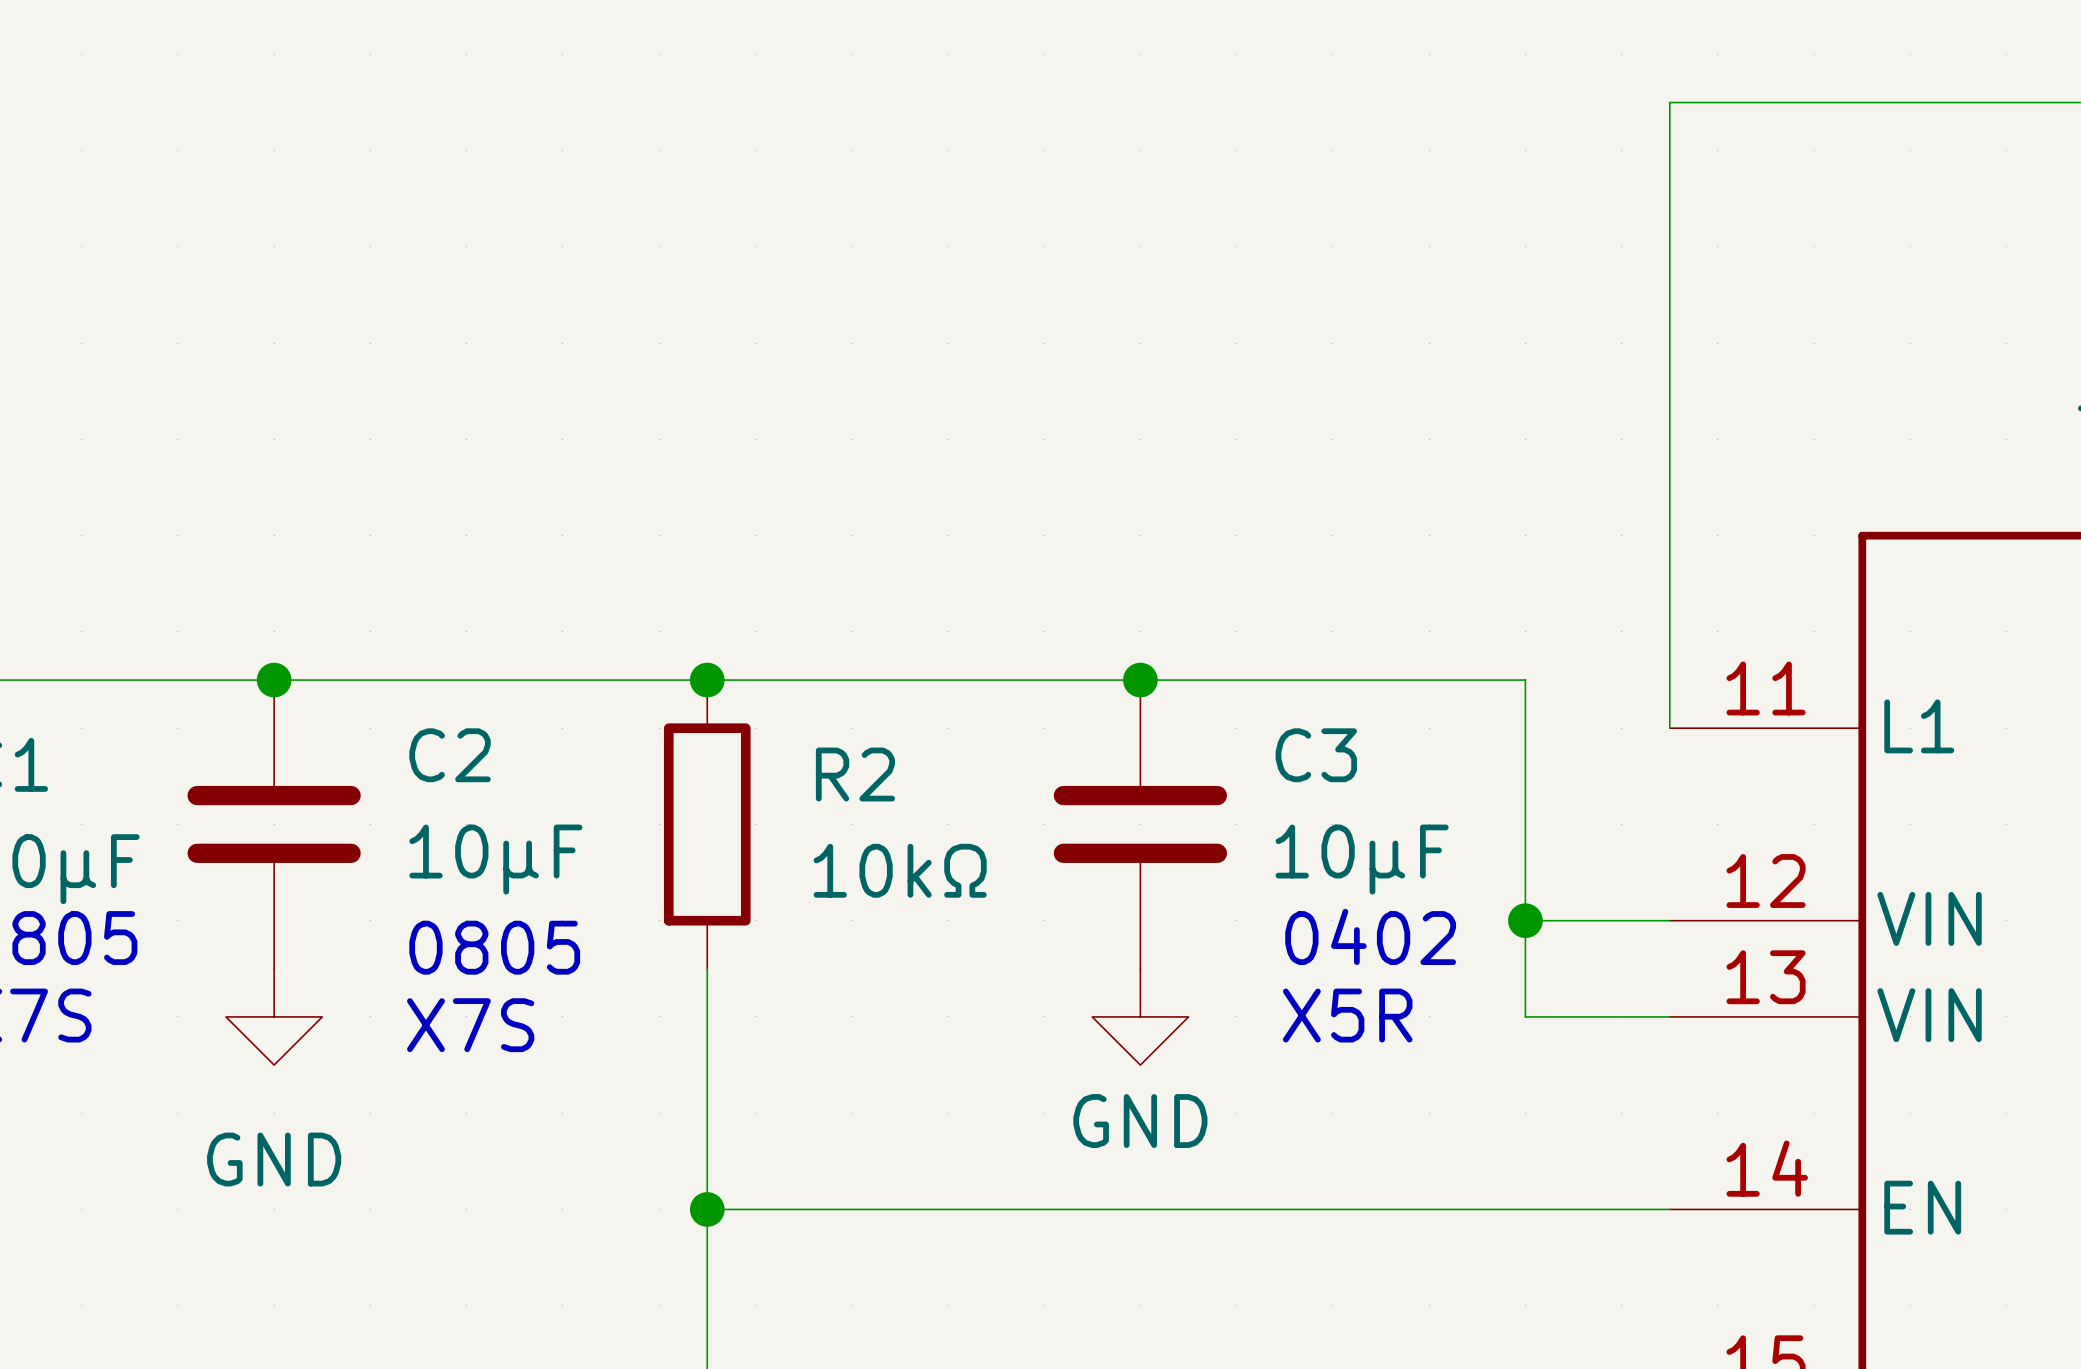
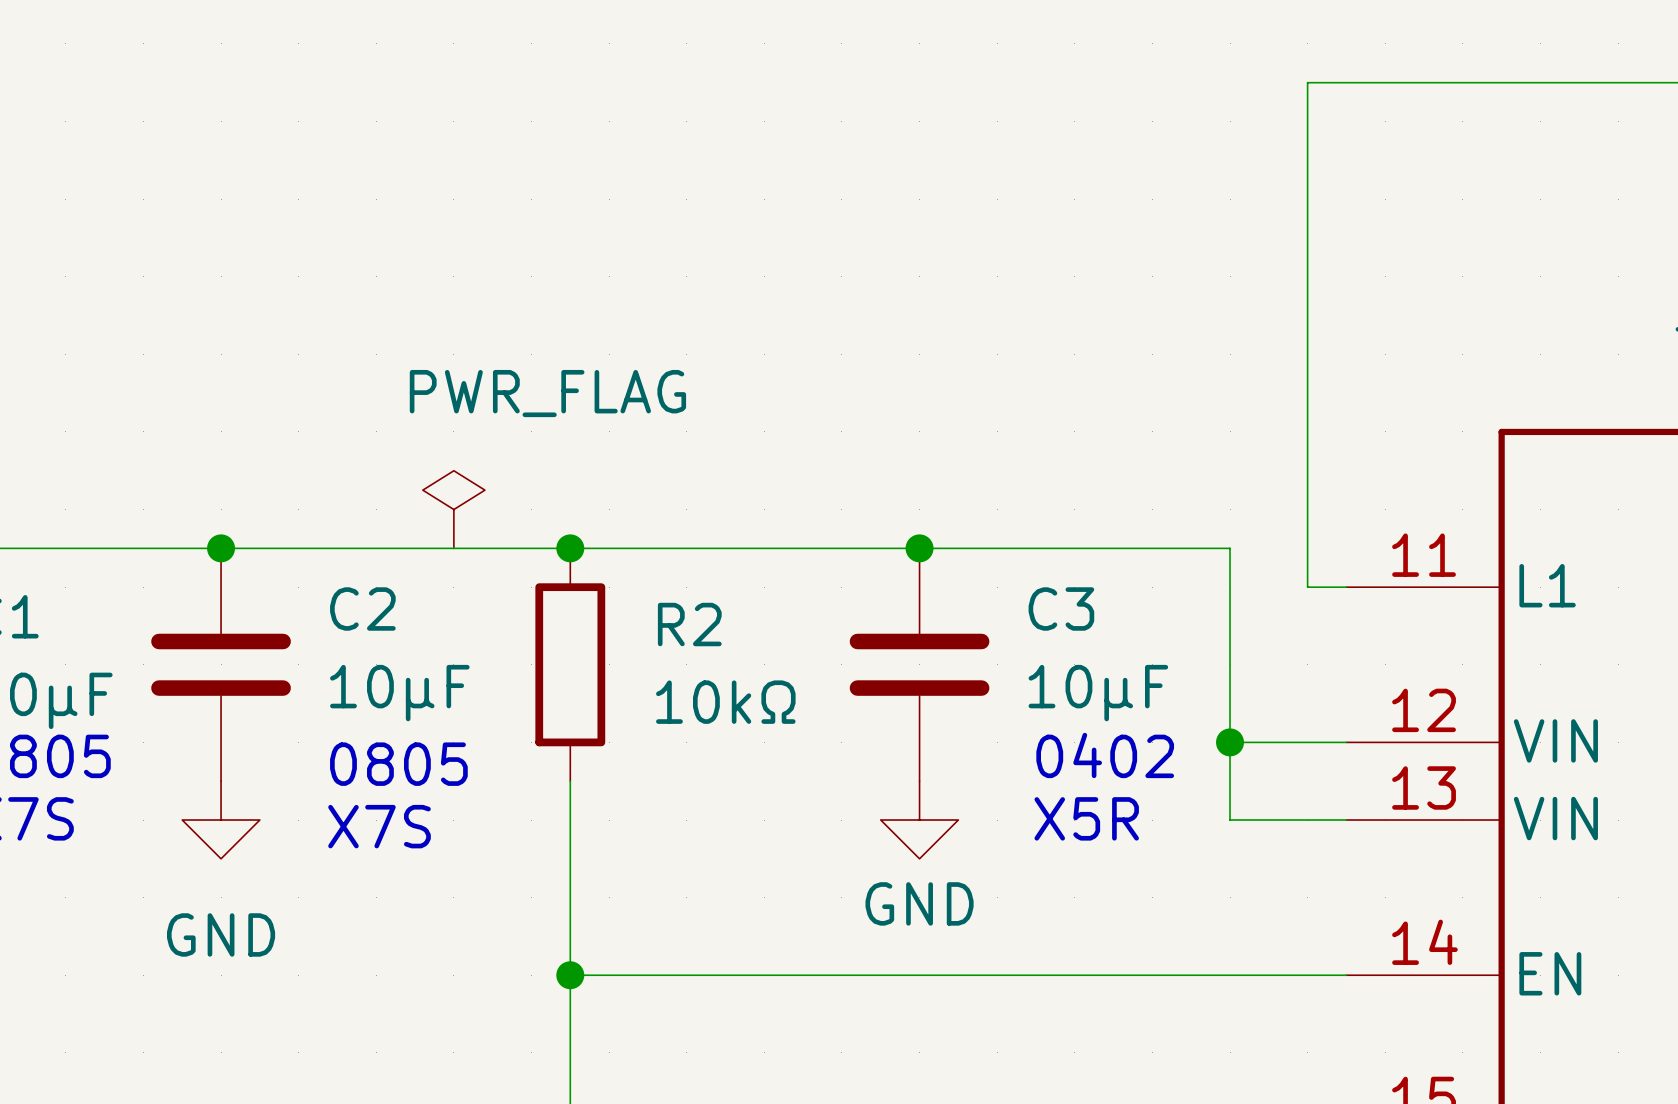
wire: (1669, 102) (1669, 728) -> (1346, 82) (1307, 82) (1307, 587) (1346, 587)
power symbol: none -> PWR_FLAG (453, 509)

